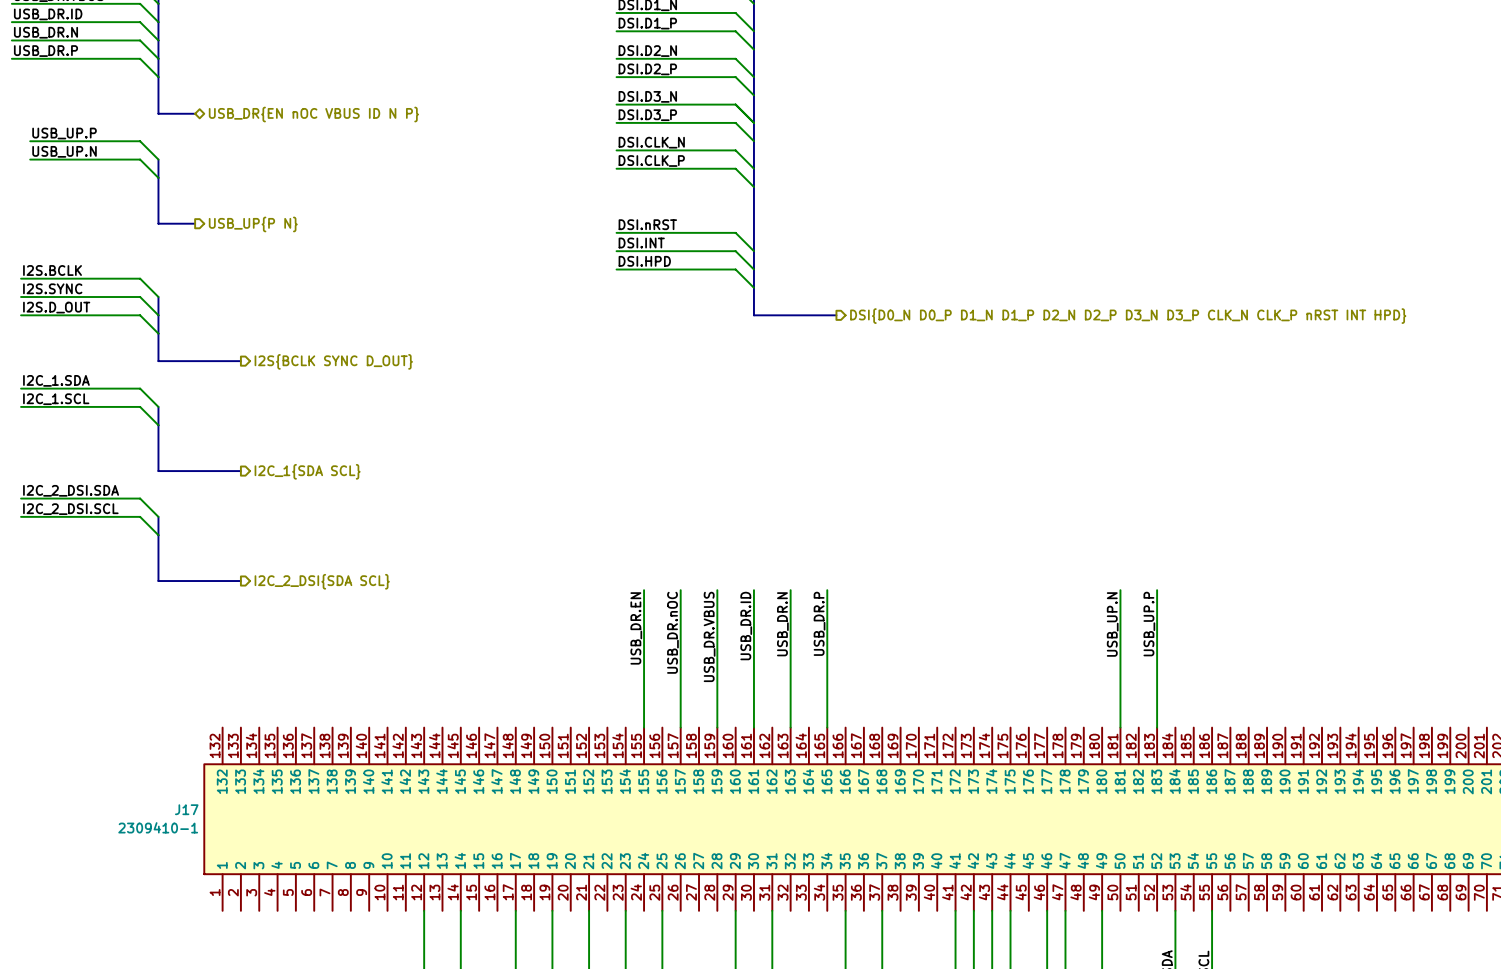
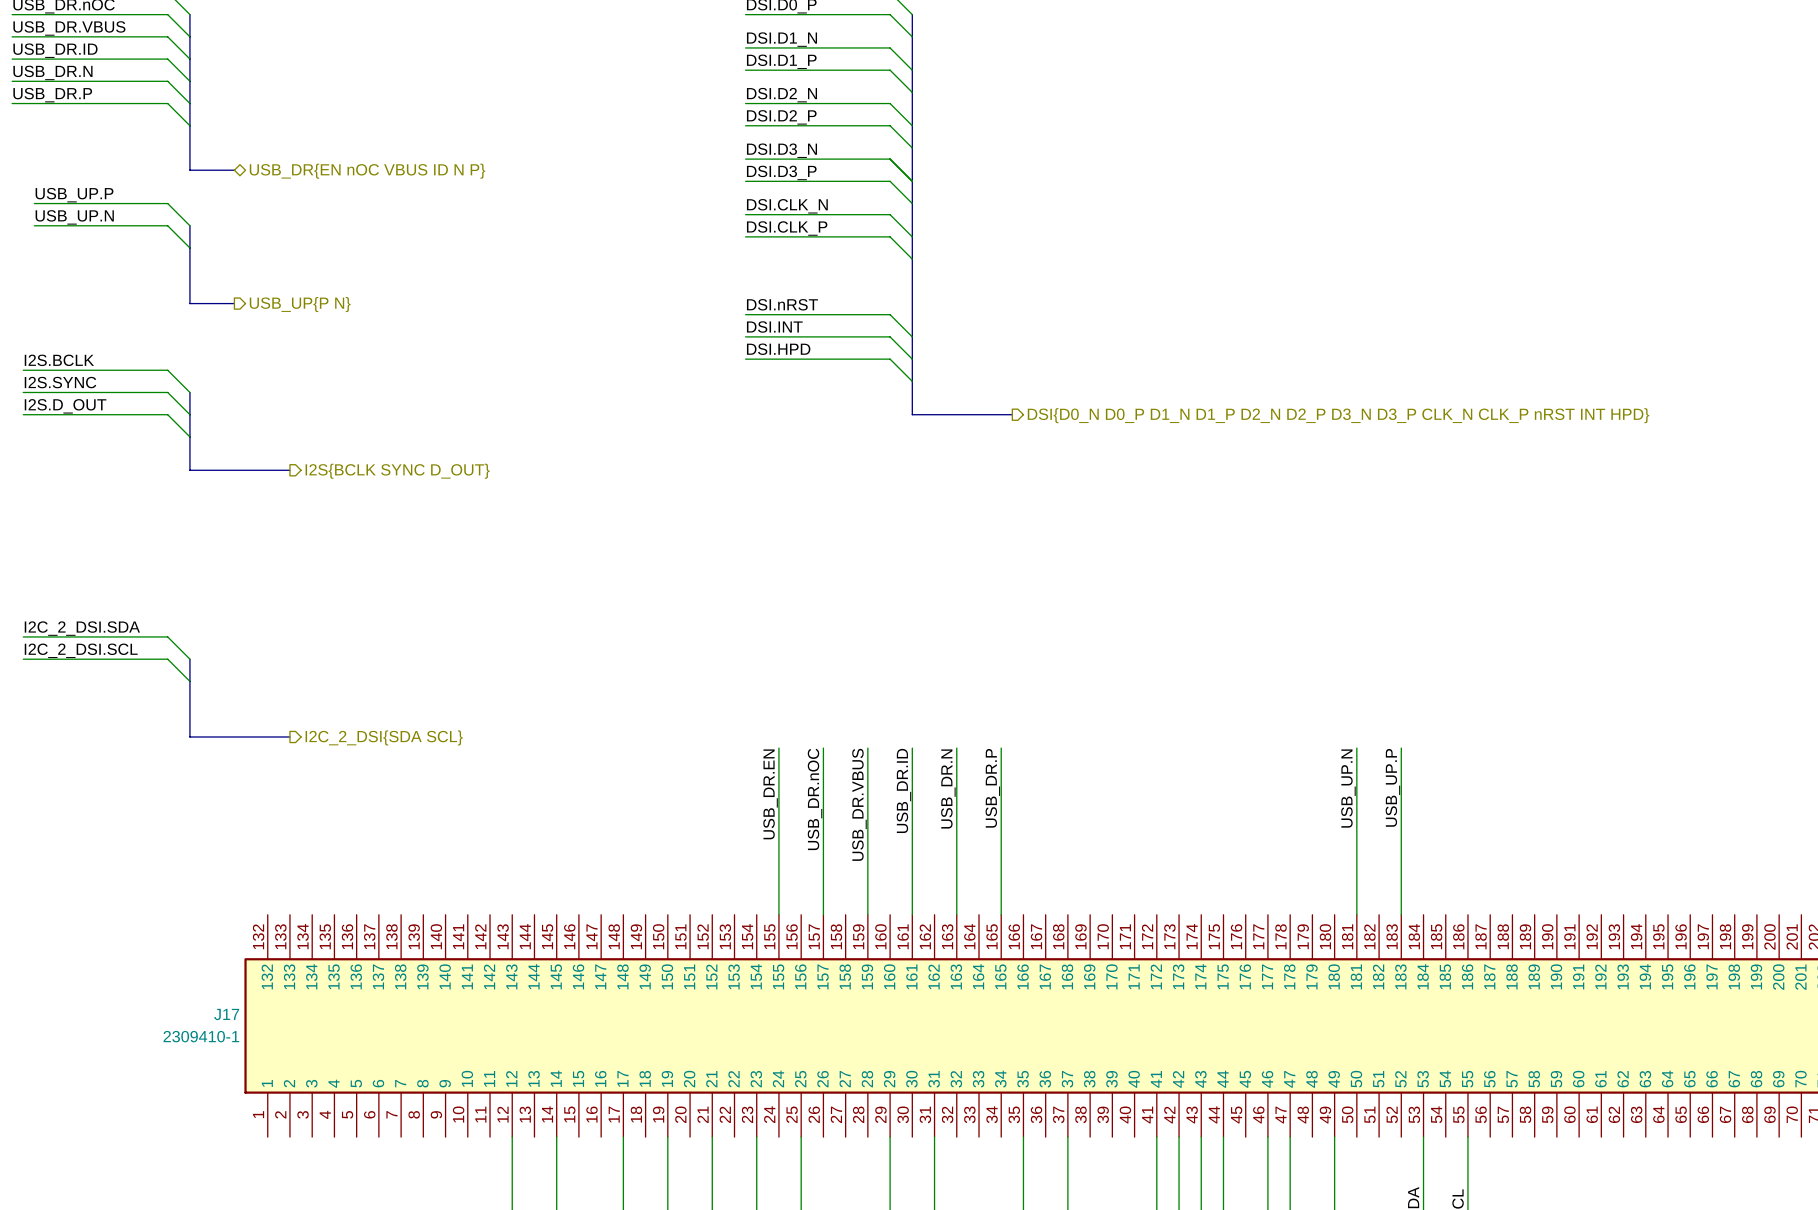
label: I2C_1.SDA (56, 380) -> none
wire: (21, 388) (140, 388) (158, 406) -> none
label: I2C_1.SCL (56, 399) -> none
wire: (21, 406) (140, 406) (158, 425) -> none
bus: (158, 406) (158, 471) (240, 471) -> none
hierarchical label: I2C_1{SDA SCL} (307, 471) -> none

